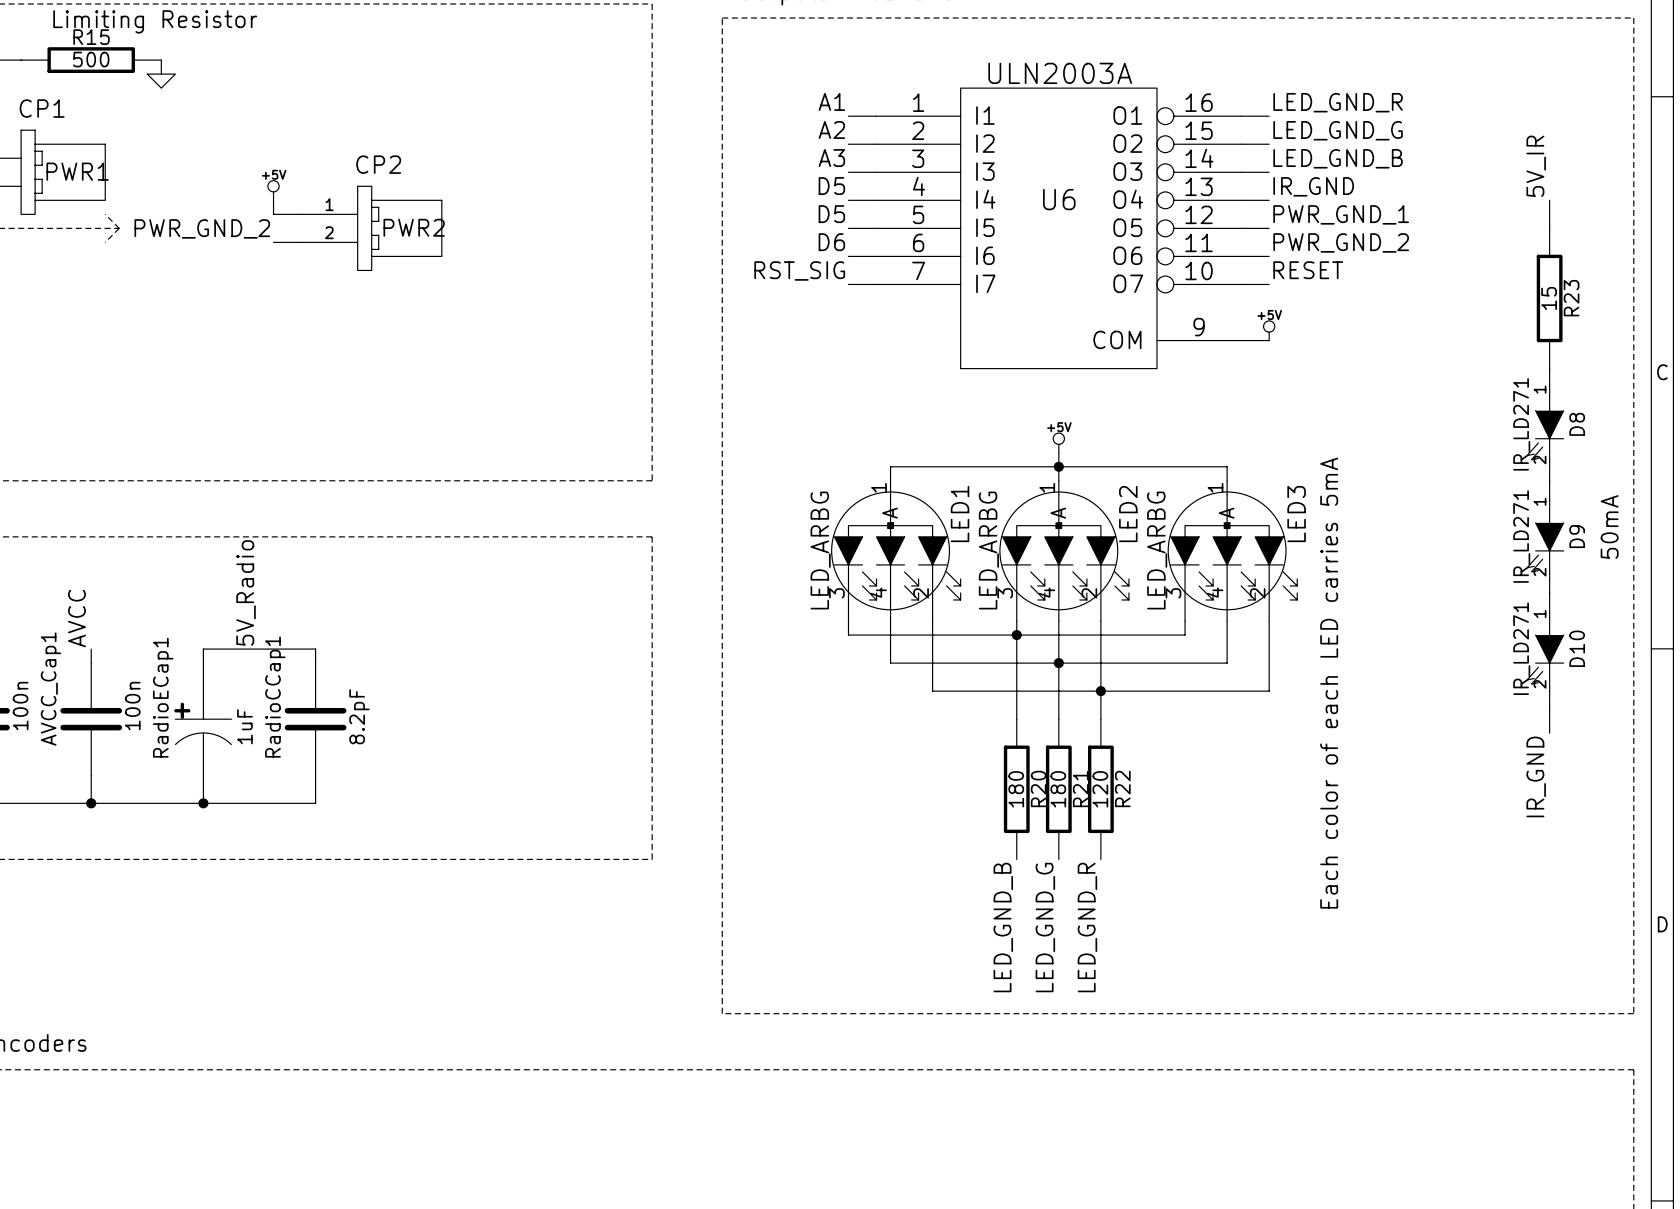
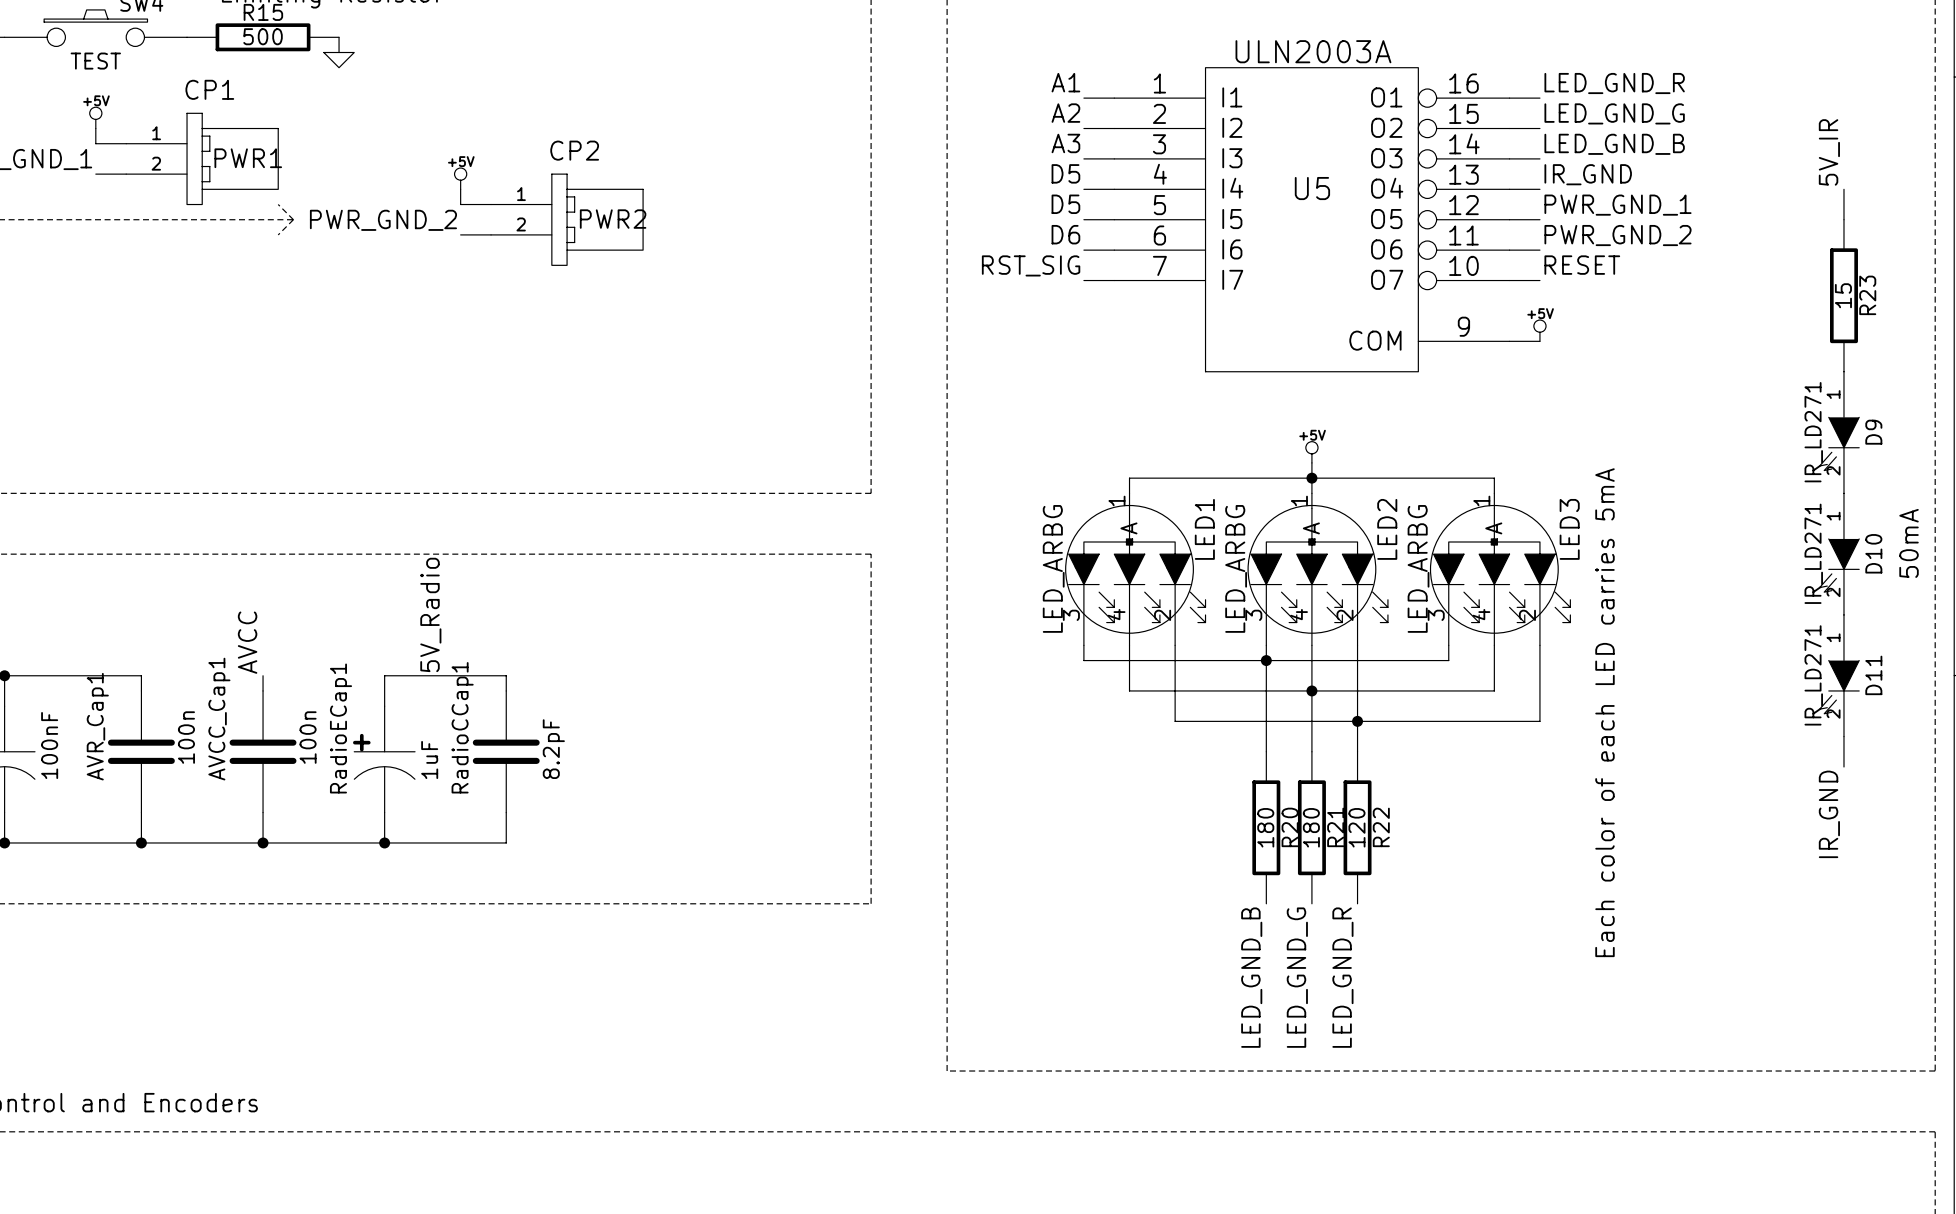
U6 name: U6 (1059, 199) -> U5 (1312, 188)
D8 name: D8 (1577, 424) -> D9 (1873, 432)
D9 name: D9 (1577, 536) -> D10 (1873, 553)
D10 name: D10 (1577, 648) -> D11 (1873, 675)

